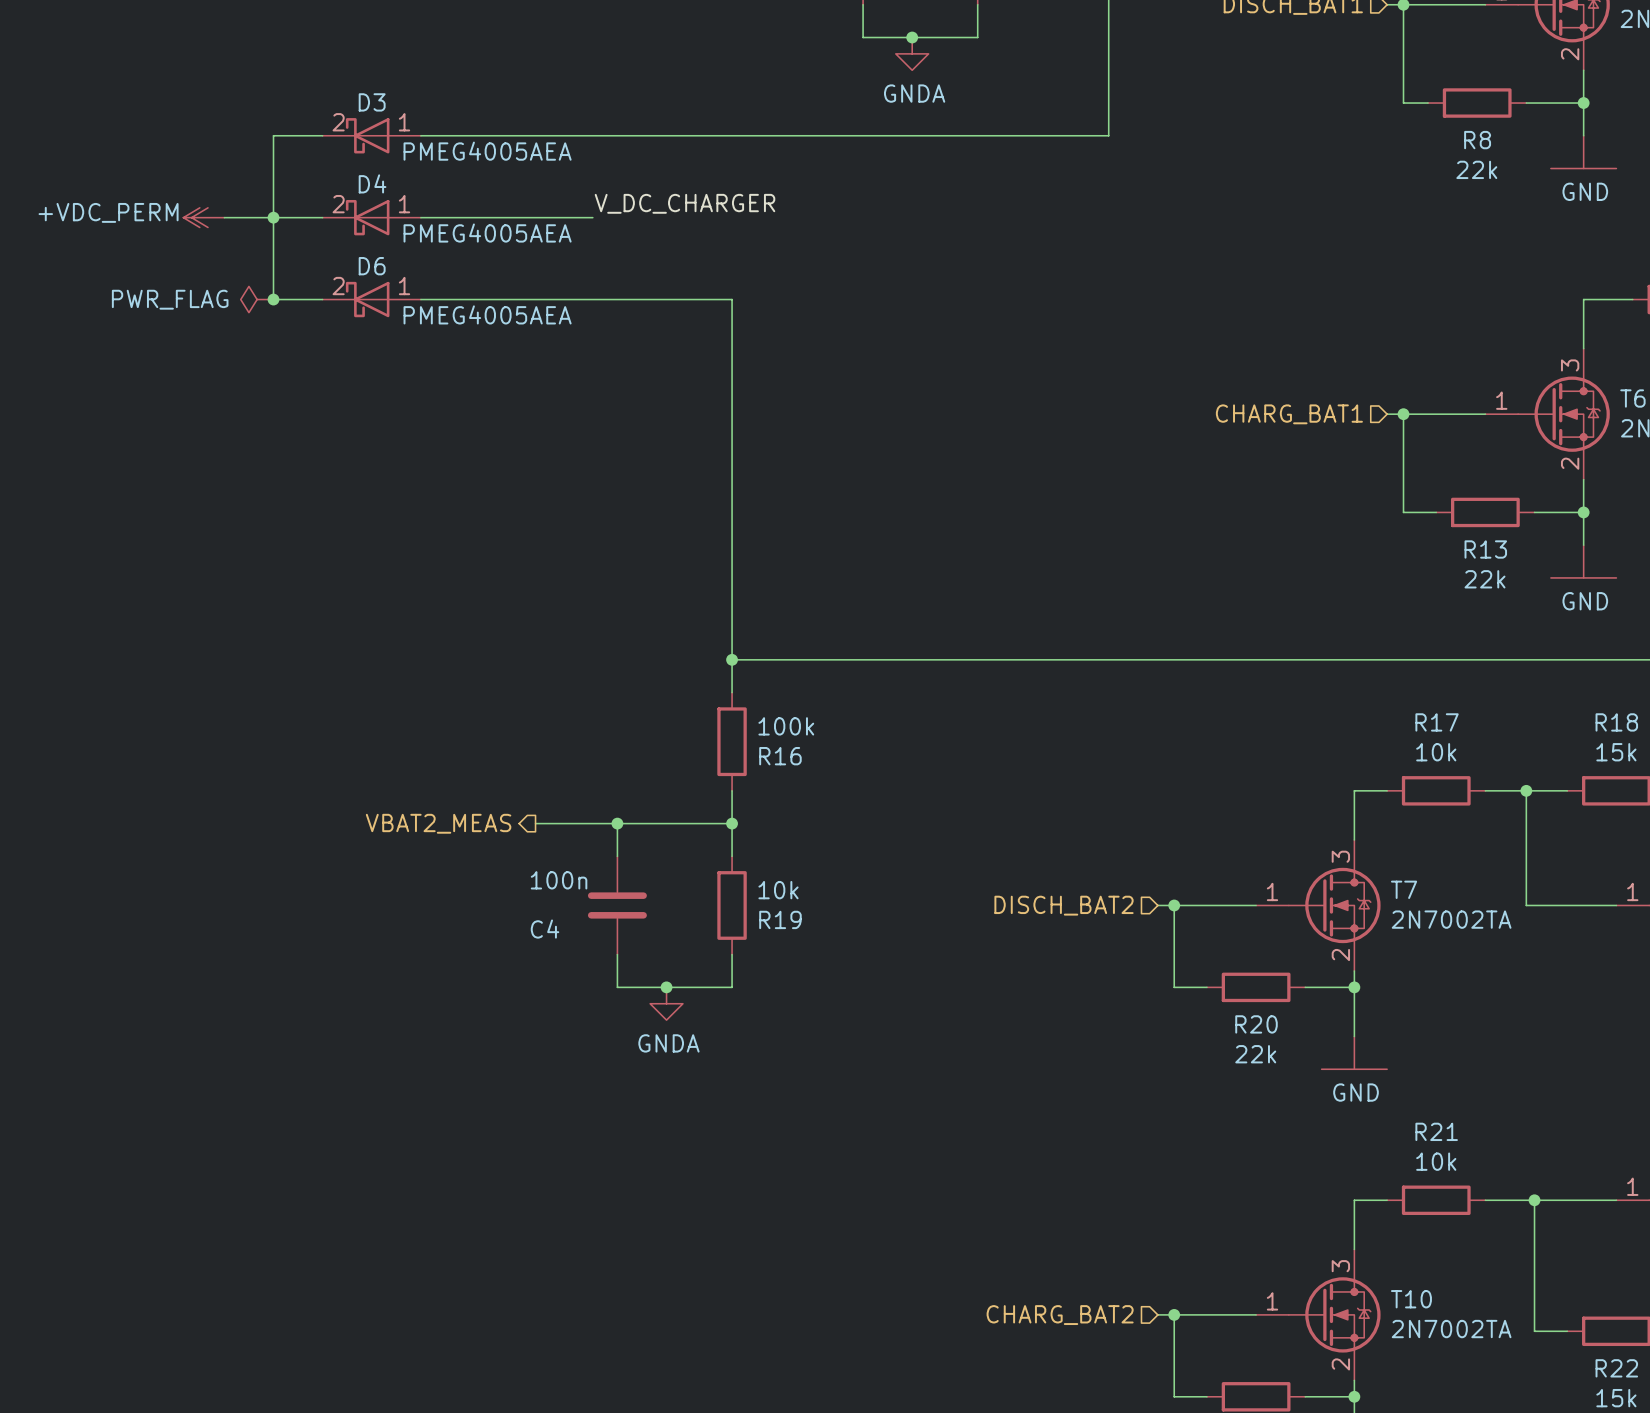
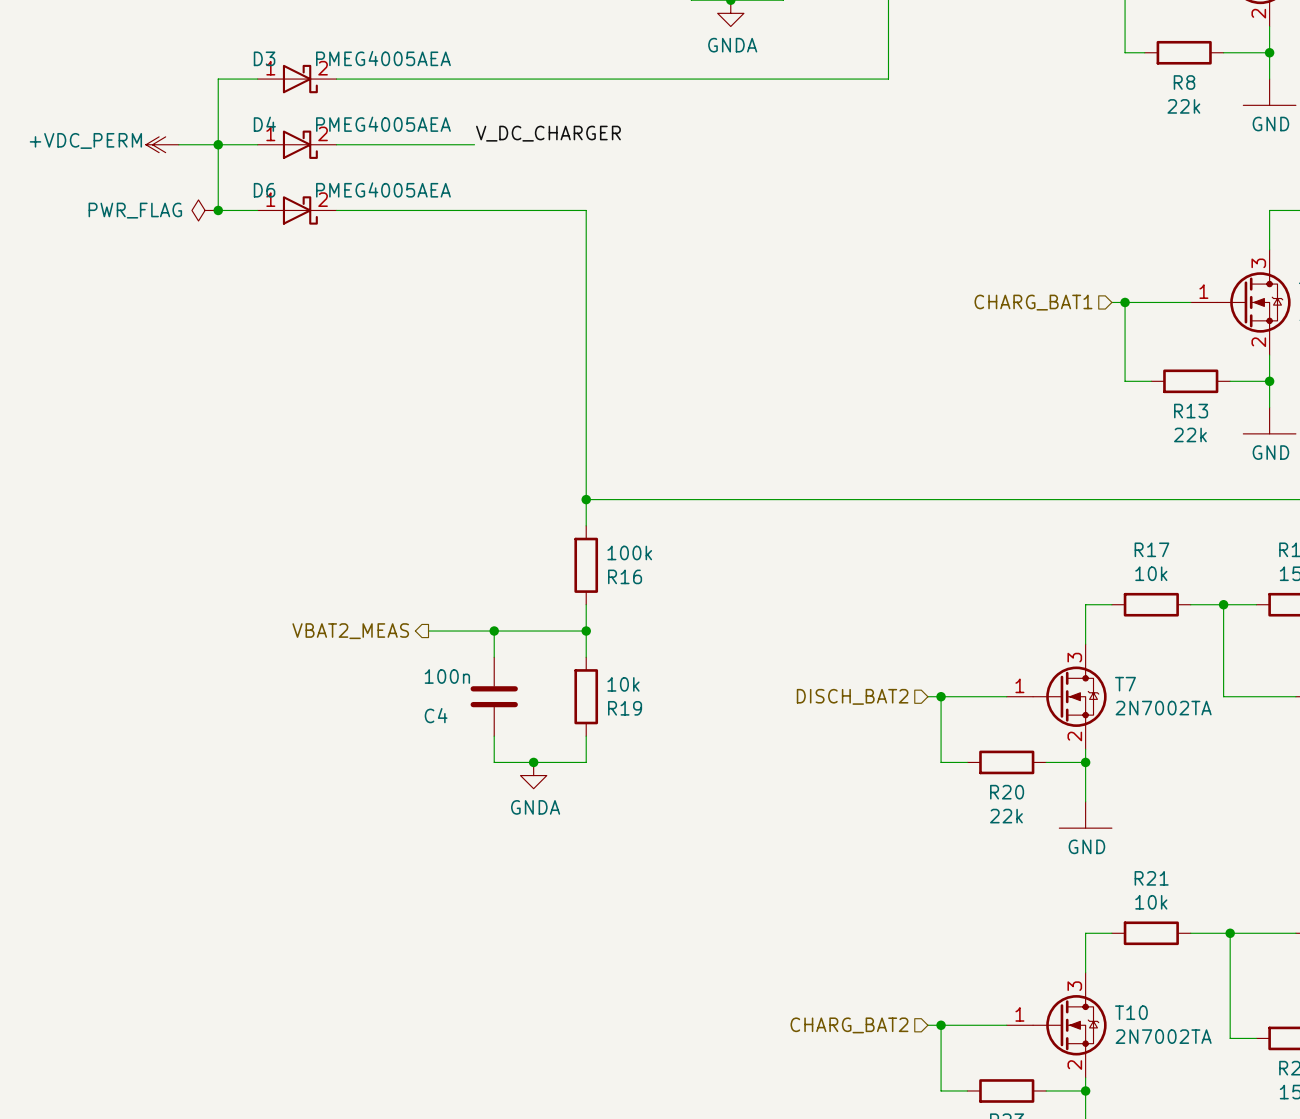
D3 name position: D3 (372, 102) -> D3 (264, 58)
D3 rotation: 0° (367, 135) -> 180° (300, 79)
D3 value position: PMEG4005AEA (487, 151) -> PMEG4005AEA (383, 58)
D4 name position: D4 (372, 183) -> D4 (264, 124)
D4 rotation: 0° (367, 217) -> 180° (300, 144)
D4 value position: PMEG4005AEA (487, 233) -> PMEG4005AEA (383, 124)
D6 name position: D6 (372, 266) -> D6 (264, 190)
D6 rotation: 0° (367, 299) -> 180° (300, 210)
D6 value position: PMEG4005AEA (487, 314) -> PMEG4005AEA (383, 189)

